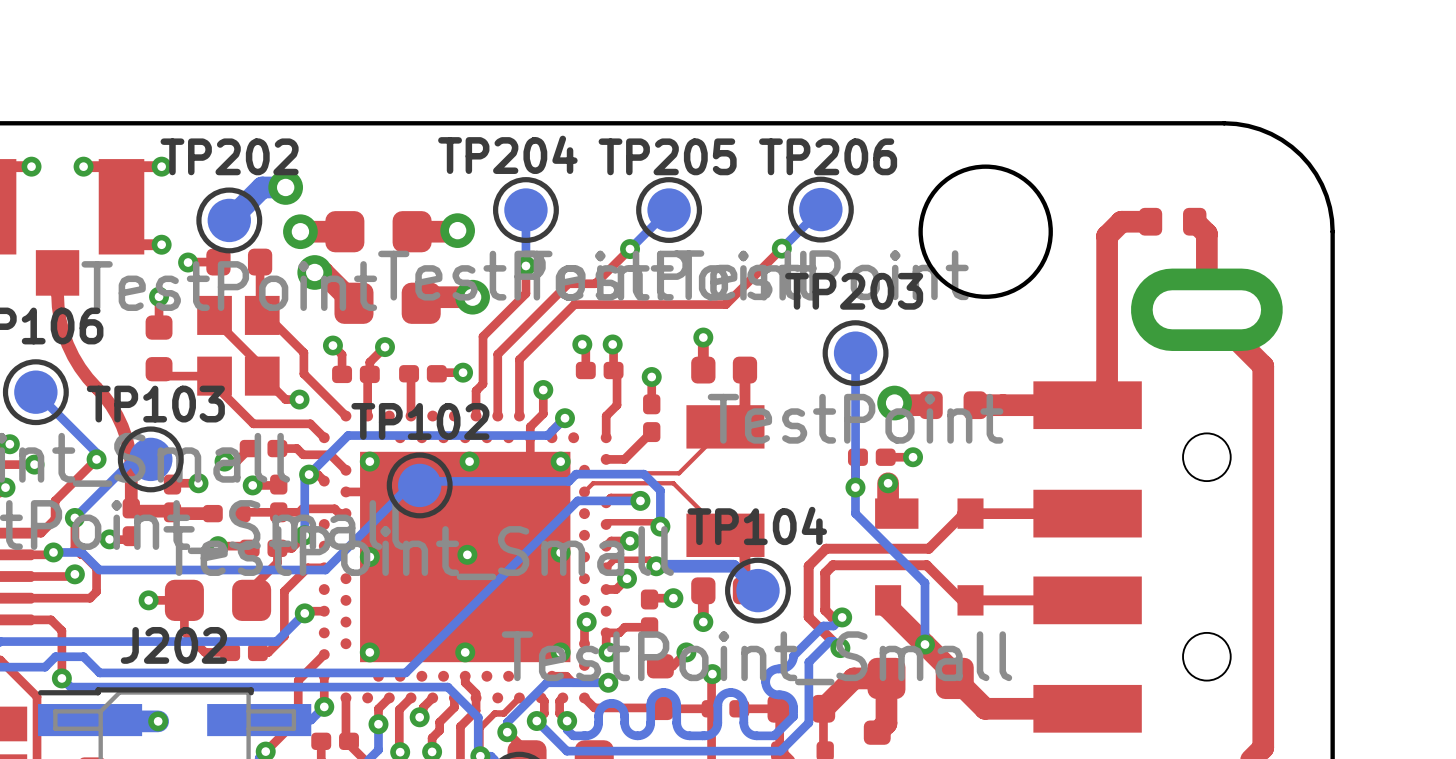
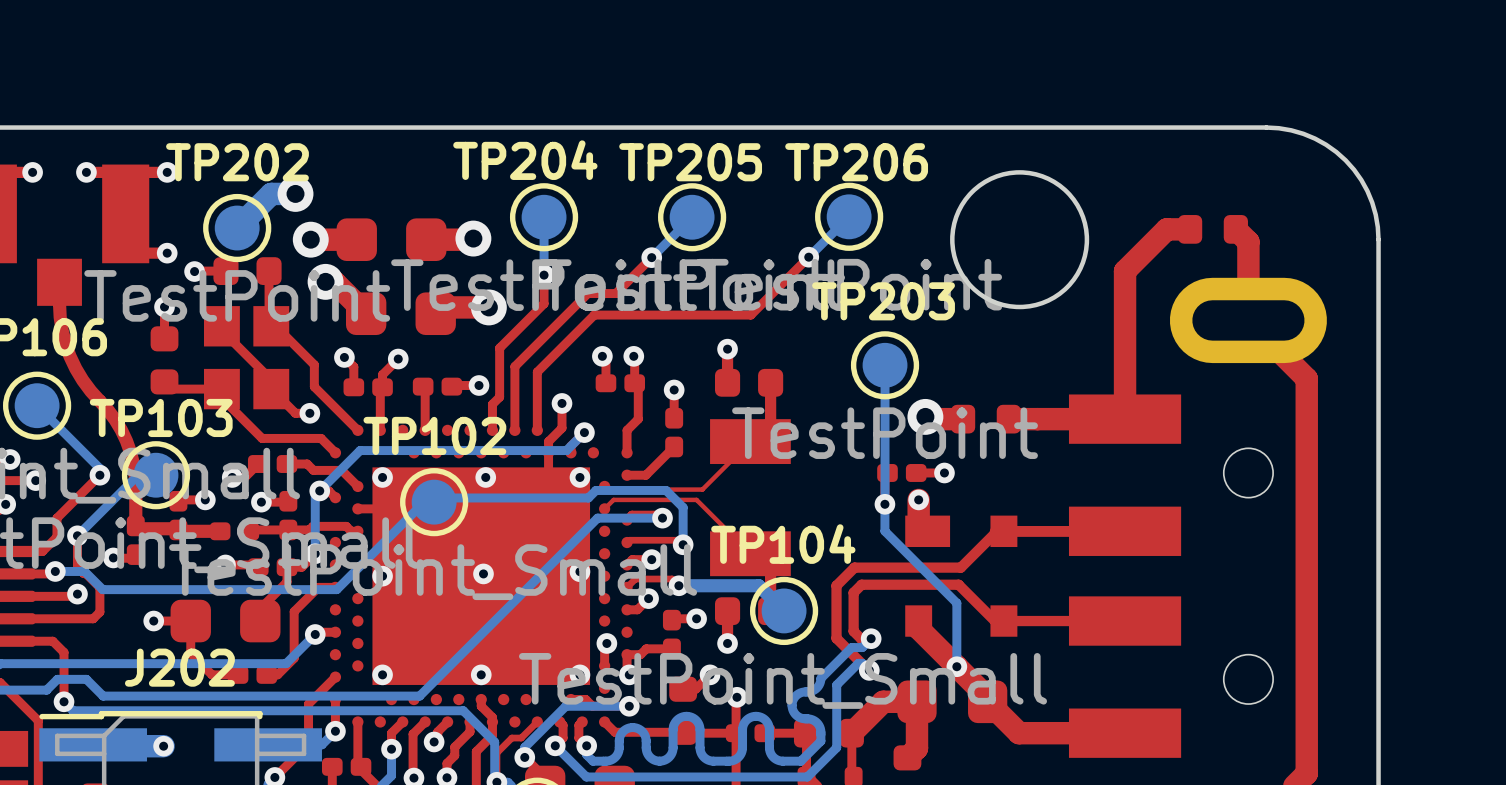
top track: (1127, 221) (1121, 221) (1107, 236) (1107, 385) (1087, 405) -> (1166, 229) (1125, 271) (1125, 419)

